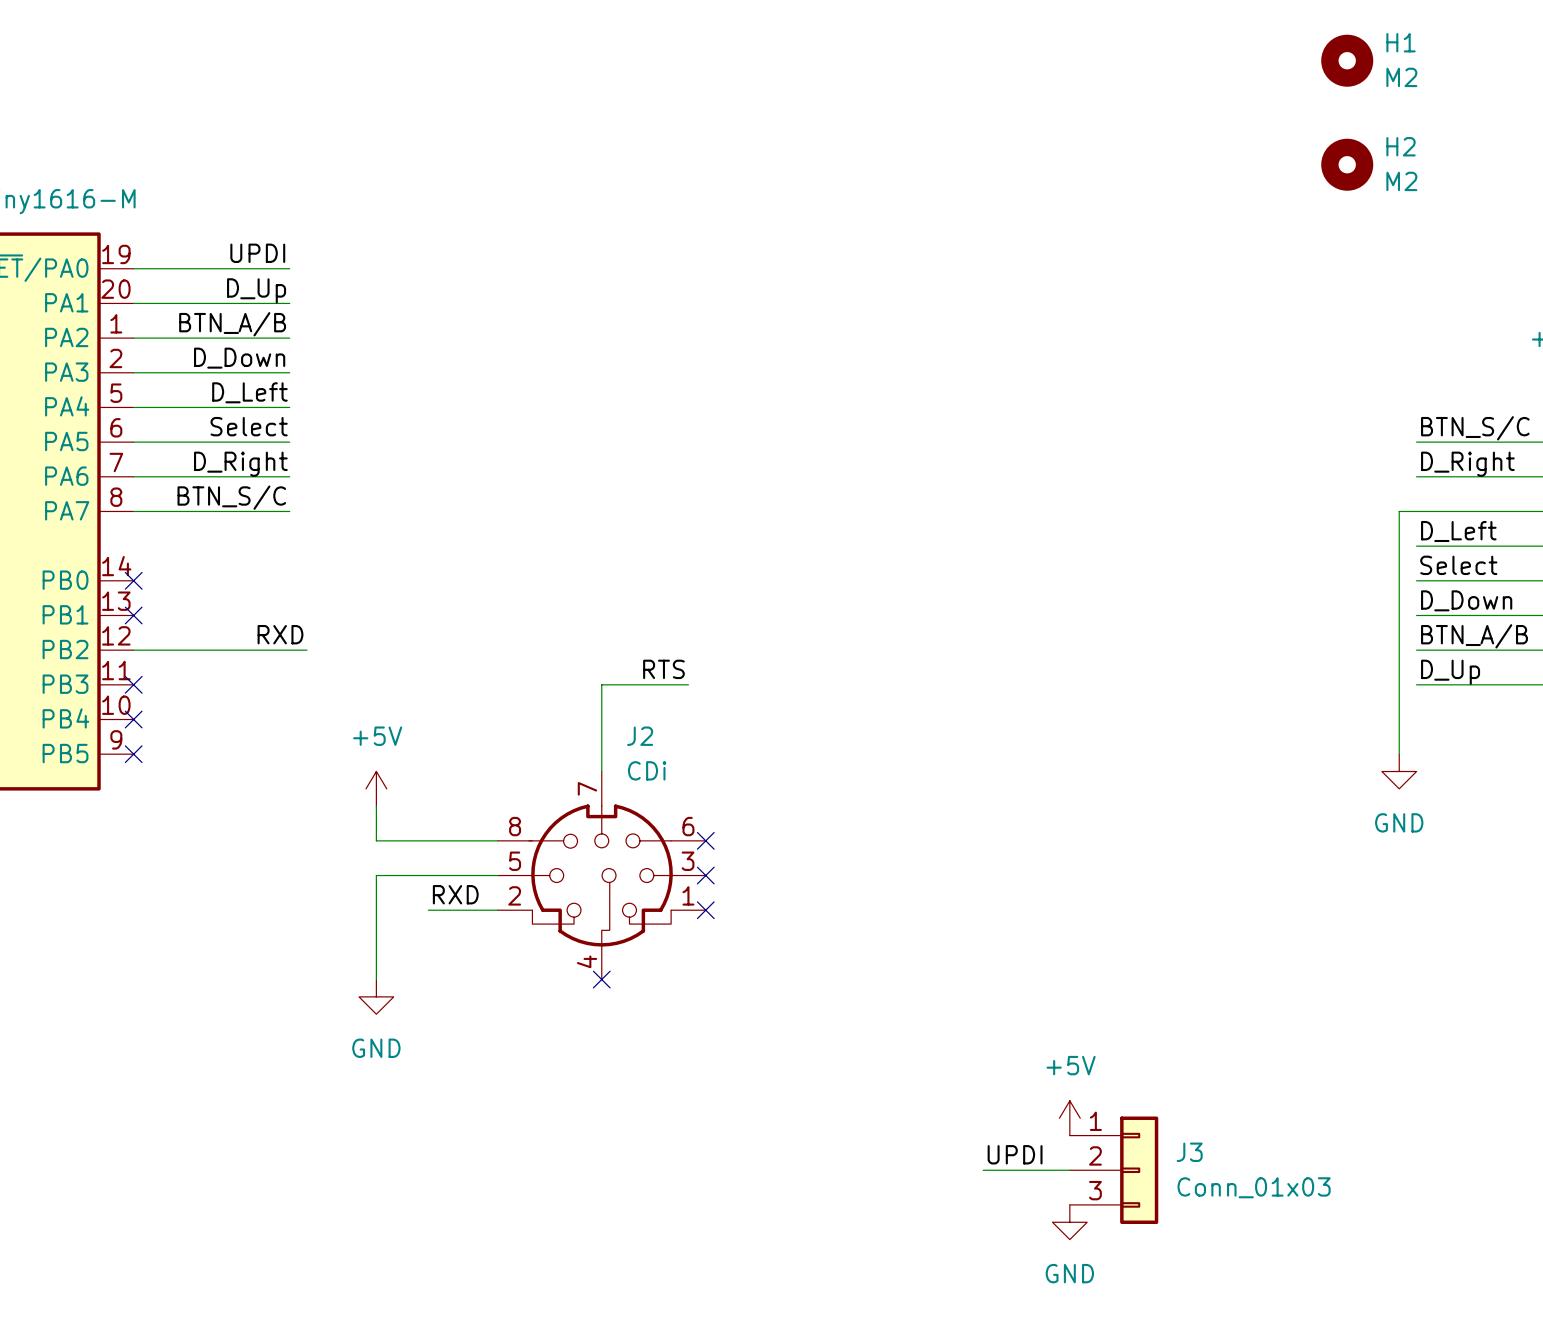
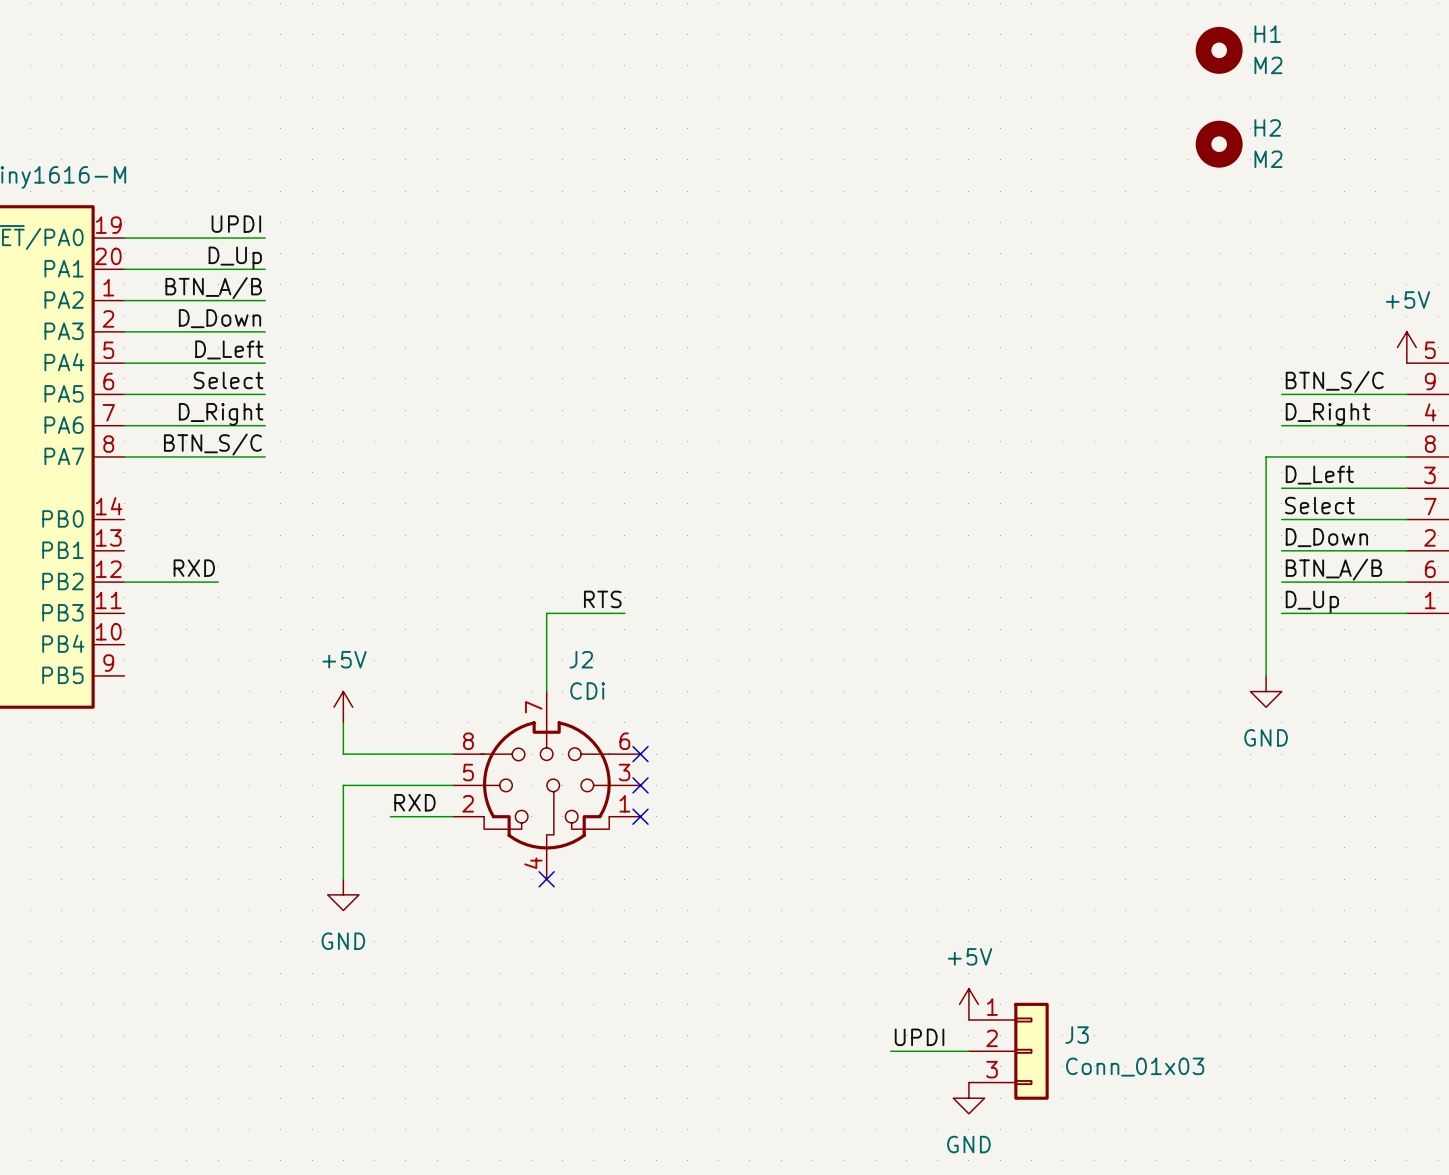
no-connect mark: (133, 580) -> none
no-connect mark: (133, 615) -> none
label position: RXD (280, 634) -> RXD (194, 568)
wire: (237, 650) (307, 650) -> none
no-connect mark: (133, 684) -> none
no-connect mark: (133, 719) -> none
no-connect mark: (133, 754) -> none

